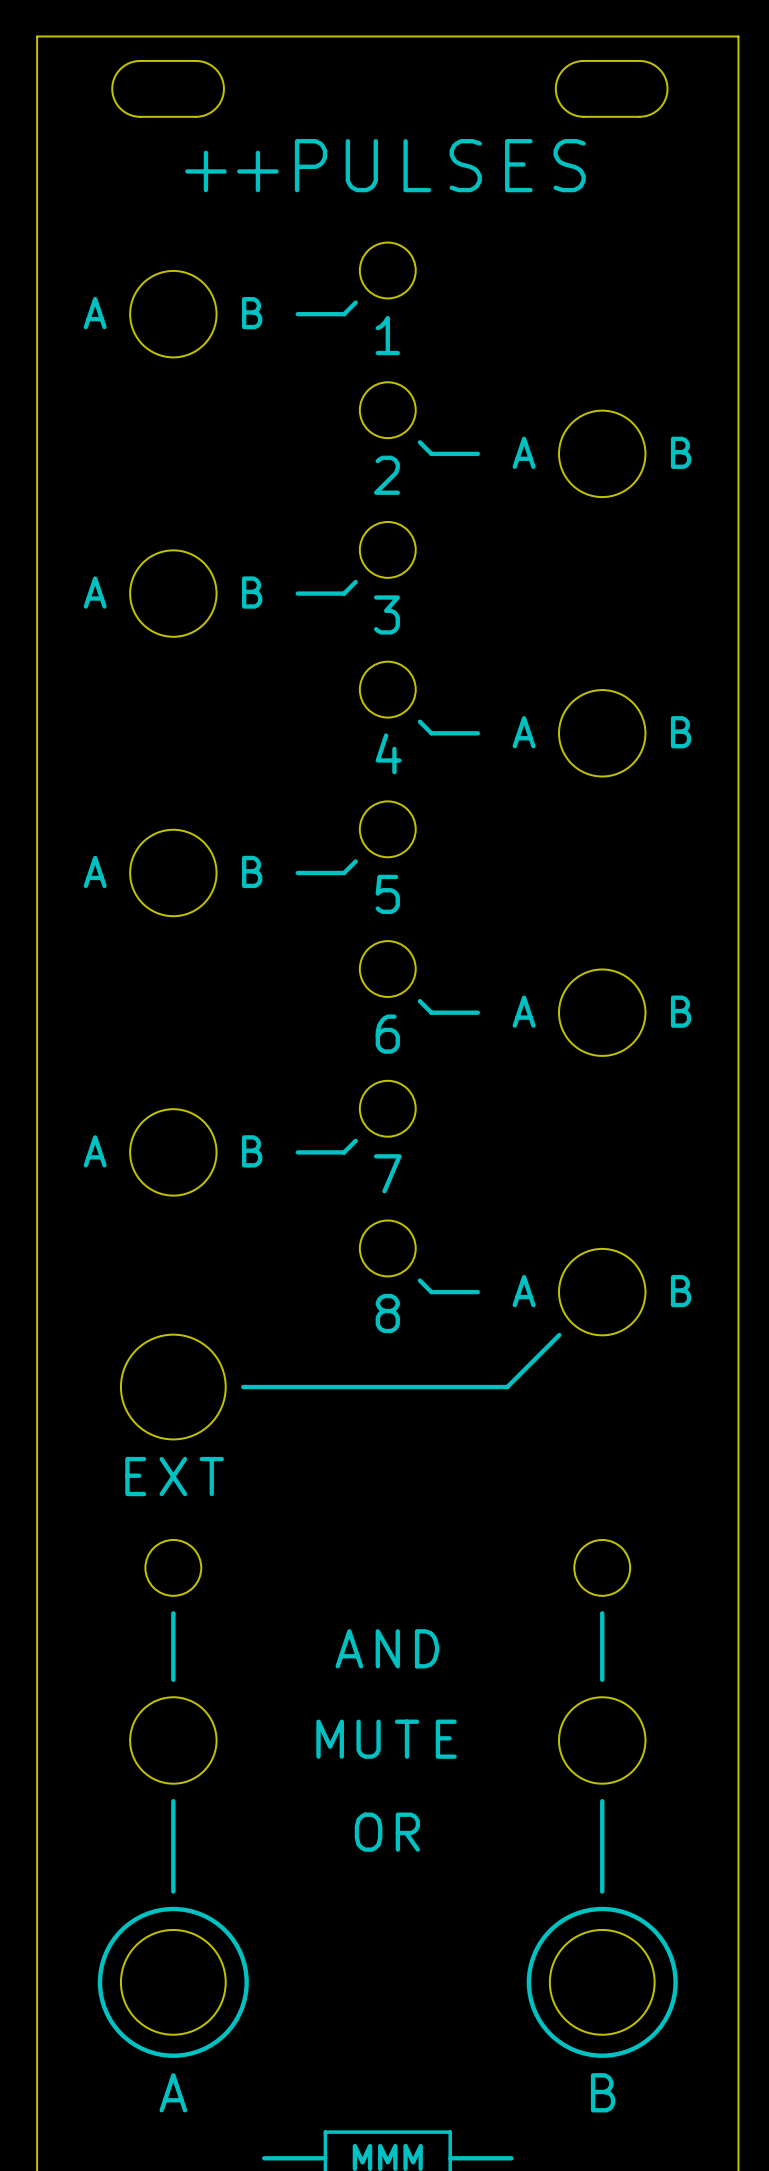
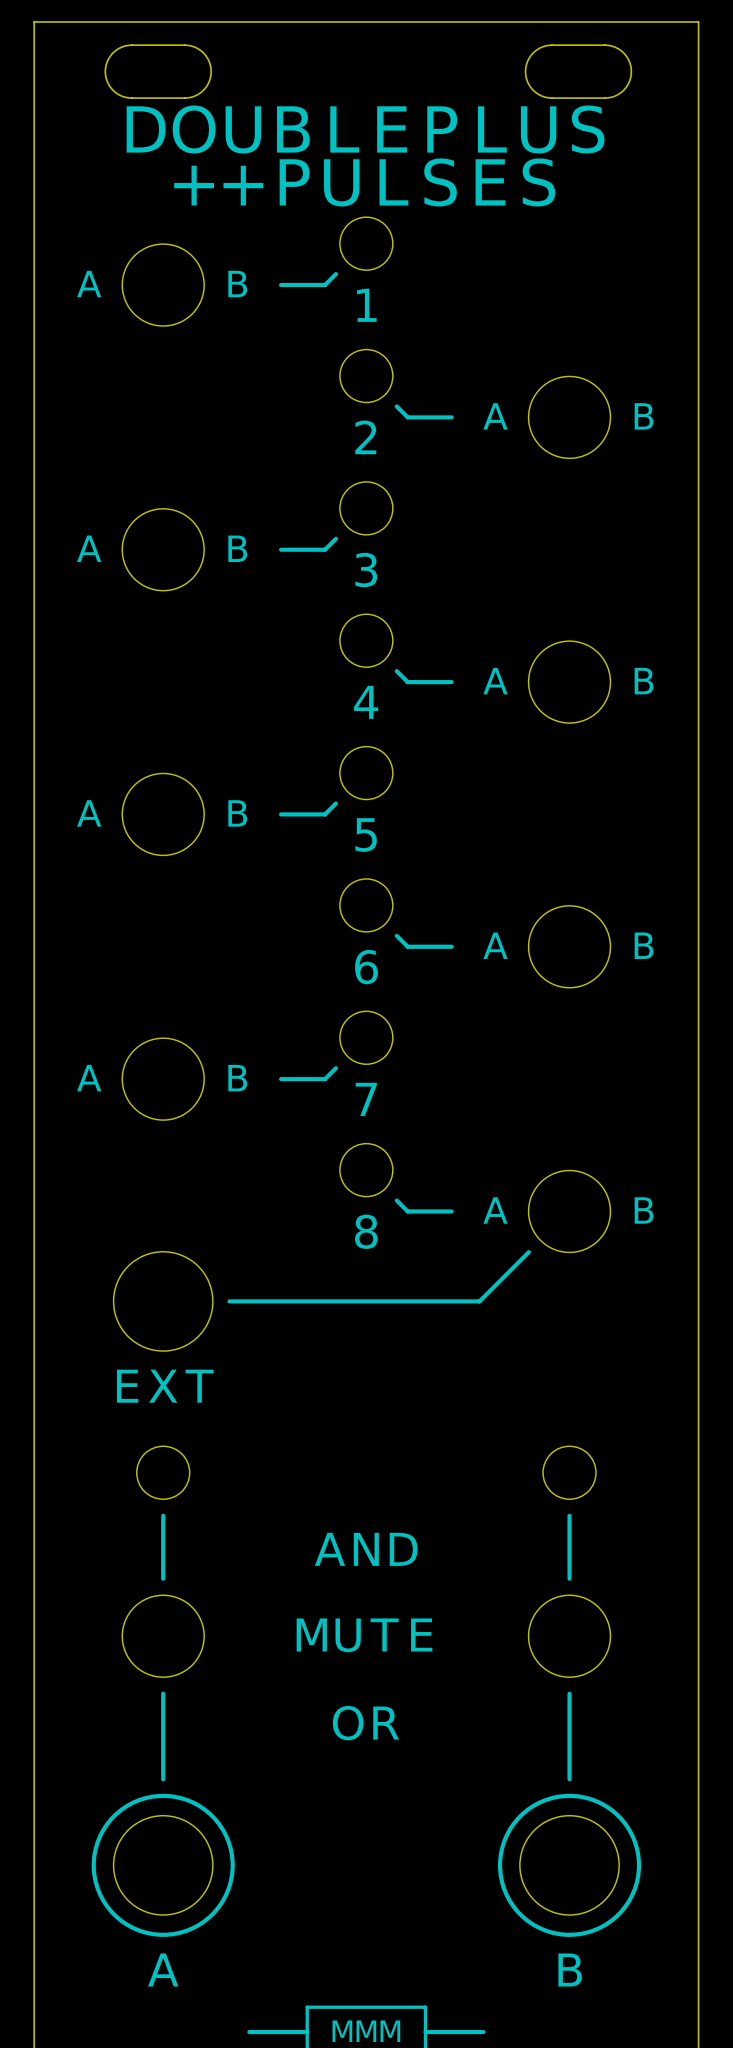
text: none -> D (146, 129)
text: none -> B (293, 129)
text: none -> L (344, 129)
text: none -> P (442, 129)
text: none -> L (492, 129)
text: none -> S (588, 129)
text position: P (311, 165) -> P (294, 182)
text position: U (361, 165) -> U (341, 182)
text: L (417, 165) -> E (392, 129)
text position: S (465, 165) -> S (440, 182)
text position: E (518, 165) -> E (490, 182)
text: S (569, 165) -> U (538, 129)
text: + (205, 171) -> O (194, 129)
text: + (257, 171) -> U (243, 129)
text: none -> L (393, 182)
text: none -> S (538, 182)
text: none -> + (194, 185)
text: none -> + (243, 185)

